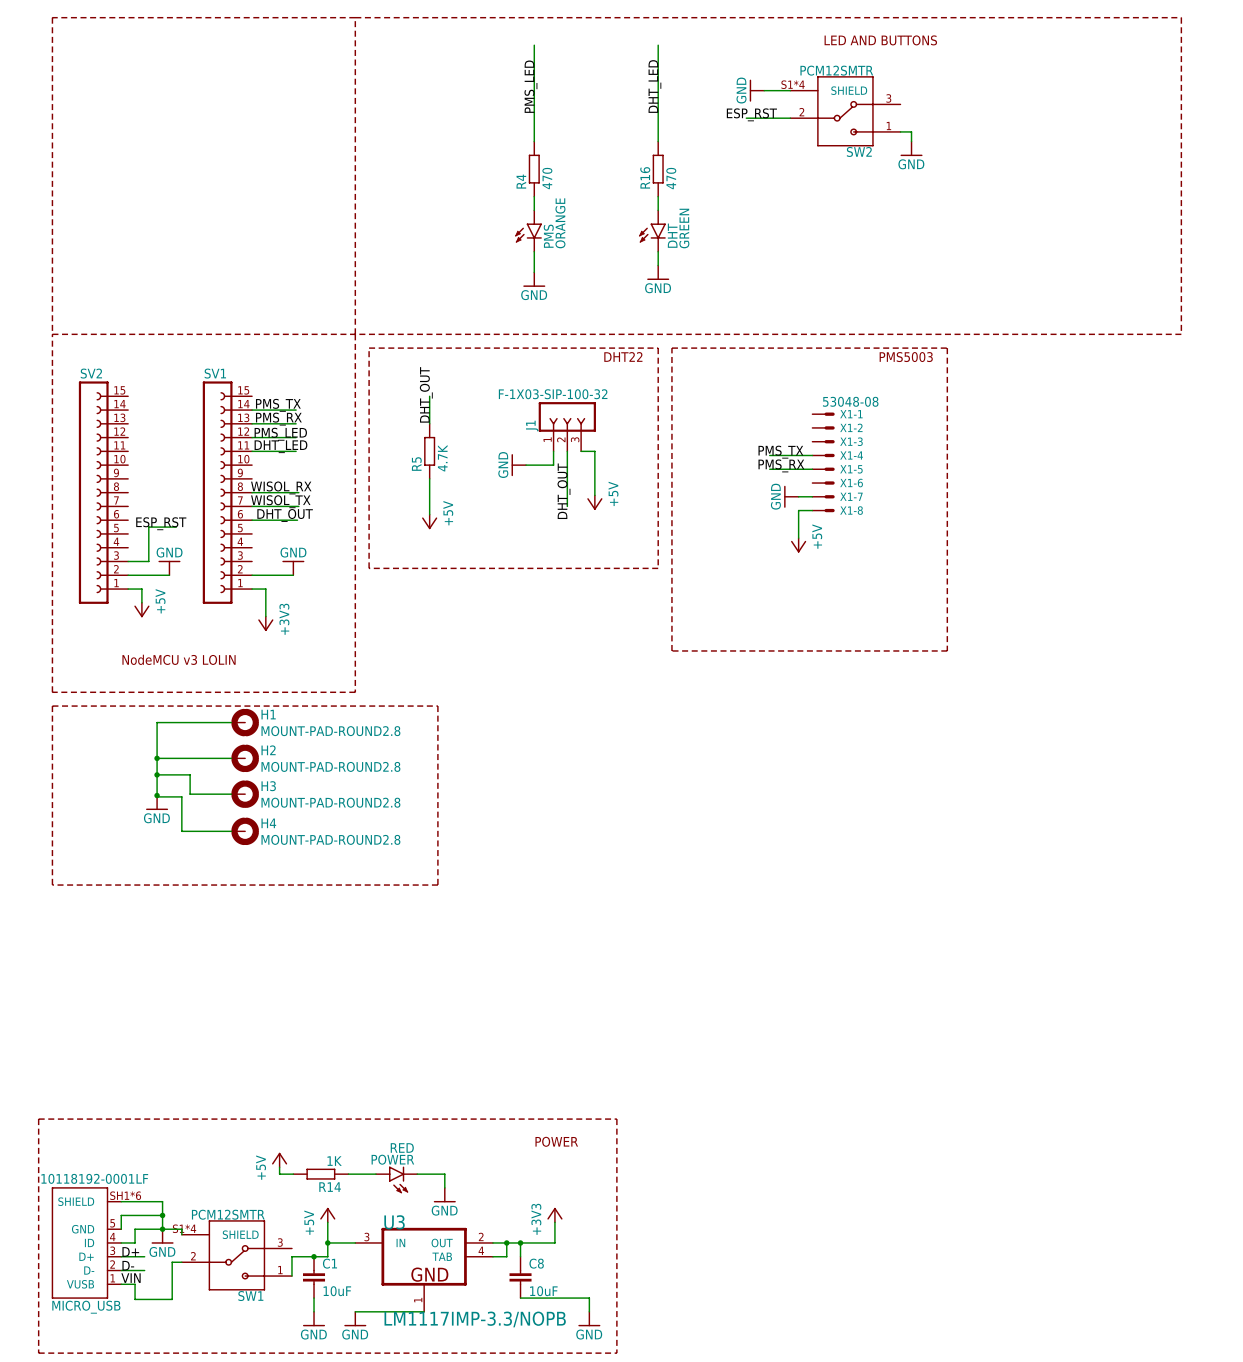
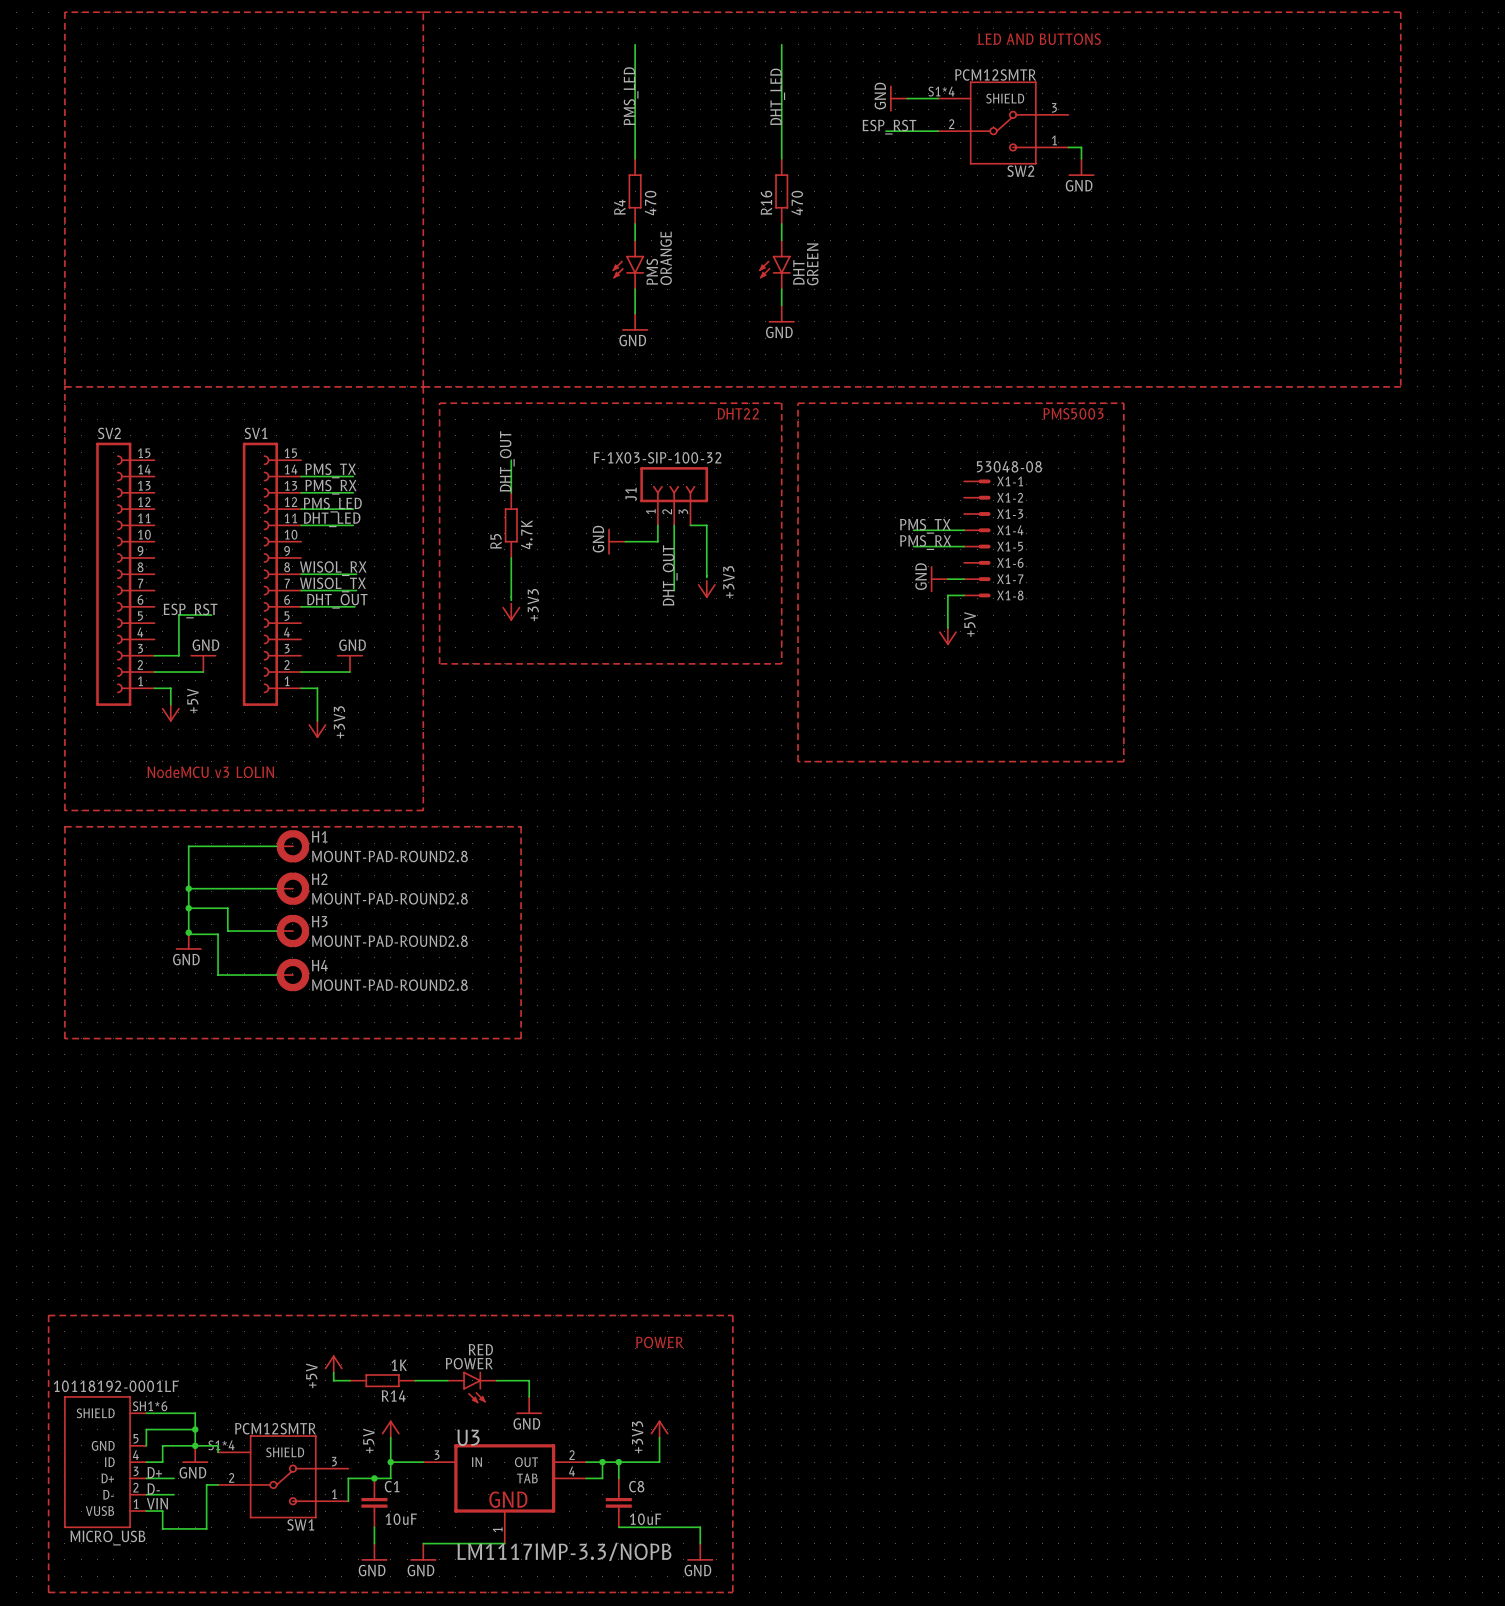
power symbol: +5V (594, 502) -> +3V3 (706, 589)
power symbol: +5V (429, 521) -> +3V3 (511, 612)

